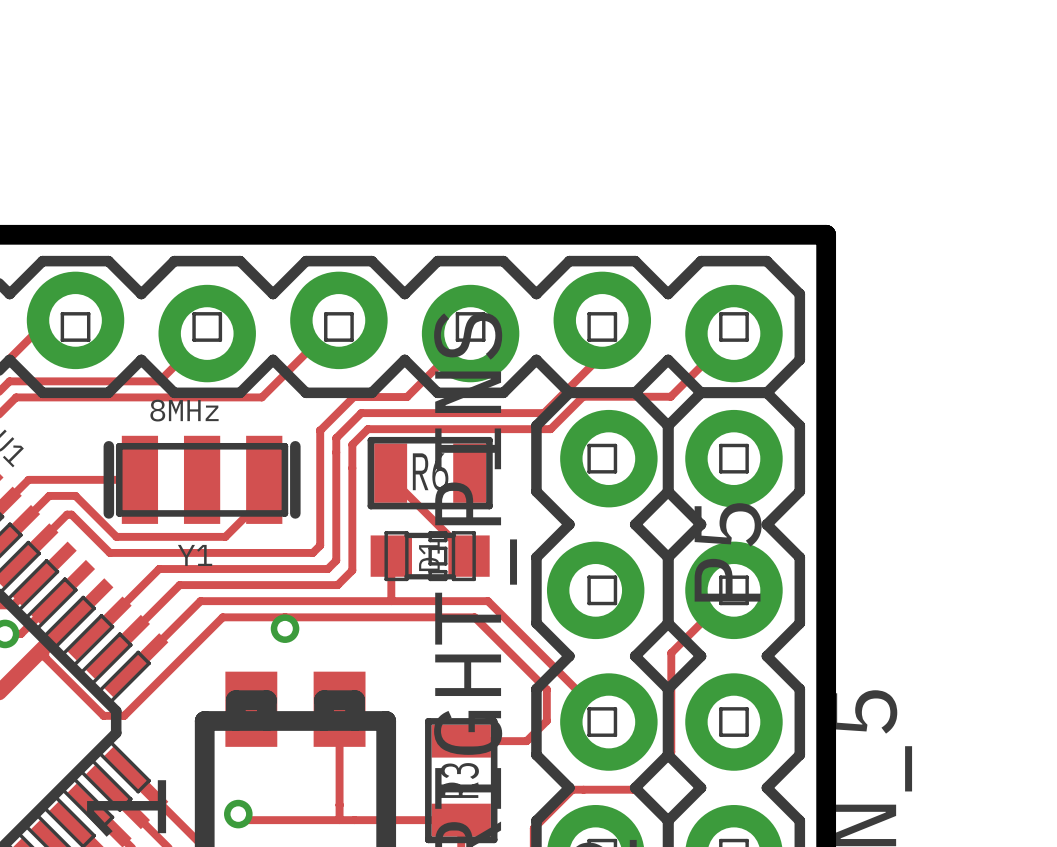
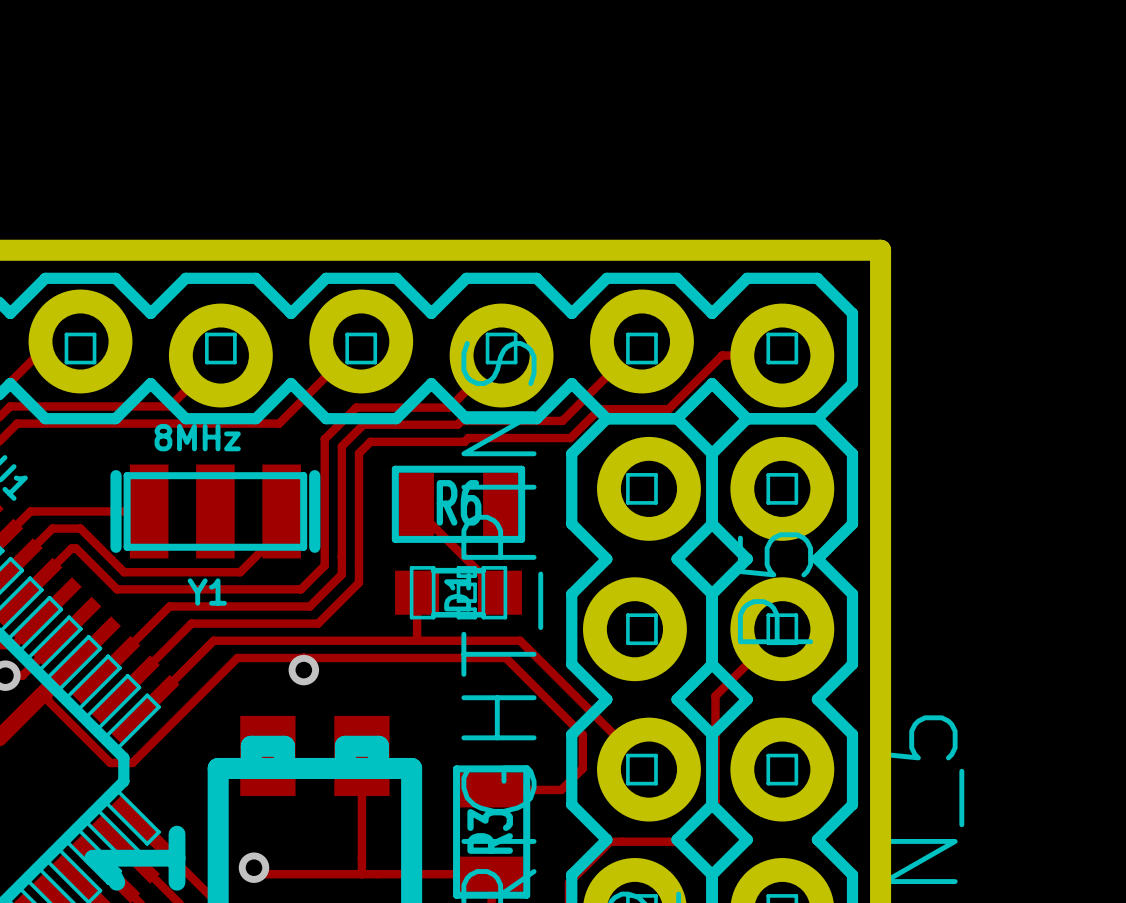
track: (602, 320) (602, 354) (544, 413) (361, 413) (336, 438) (336, 560) (327, 569) (290, 569) -> (641, 341) (562, 420) (461, 420) (457, 424) (363, 424) (341, 446) (341, 574) (309, 606)
track: (733, 333) (670, 396) (583, 396) (550, 429) (367, 429) (352, 444) (352, 570) (337, 585) (298, 585) -> (782, 355) (722, 355) (668, 409) (599, 409) (570, 438) (468, 438) (464, 441) (370, 441) (358, 453) (358, 582) (318, 623)
track: (421, 382) (407, 397) (353, 397) (320, 430) (320, 545) (312, 552) (282, 552) -> (449, 407) (356, 407) (324, 439) (324, 565) (301, 589)

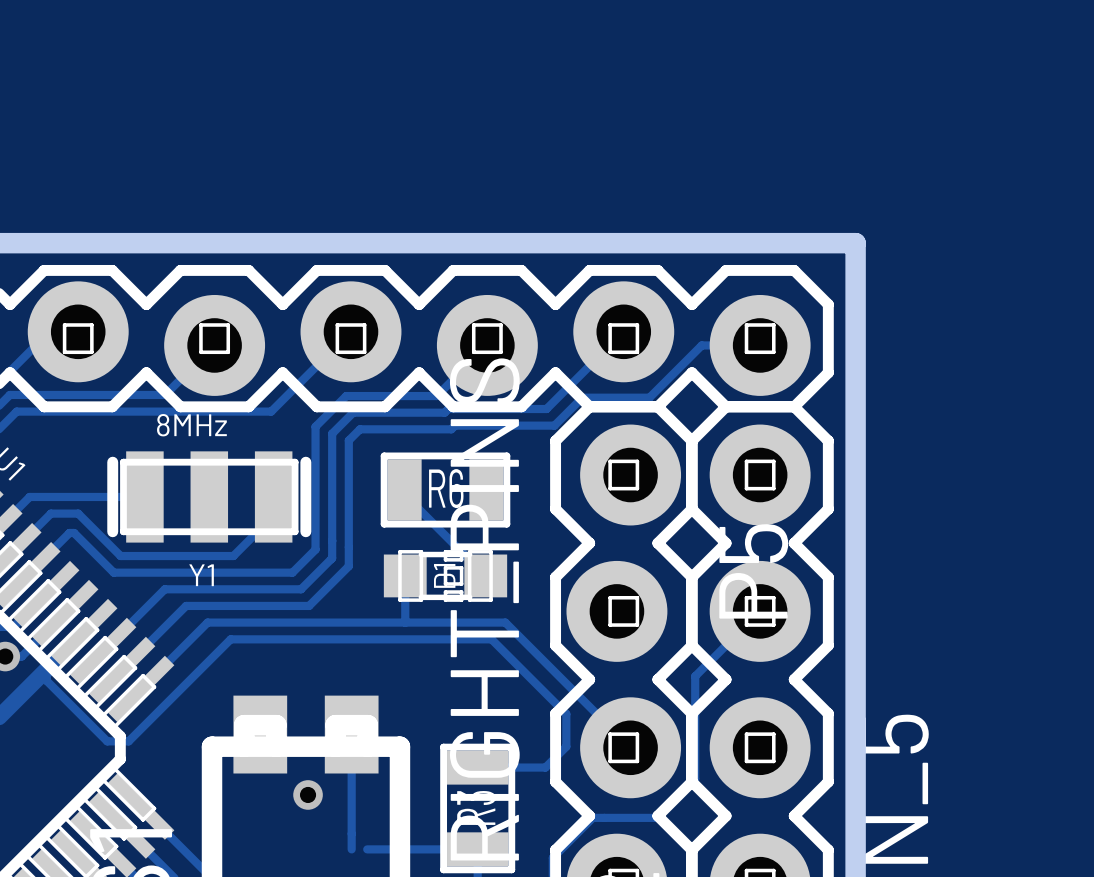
via: (303, 670) -> none
via: none -> (308, 794)
track: (253, 867) (260, 874) (377, 874) -> none
via: (253, 867) -> none

